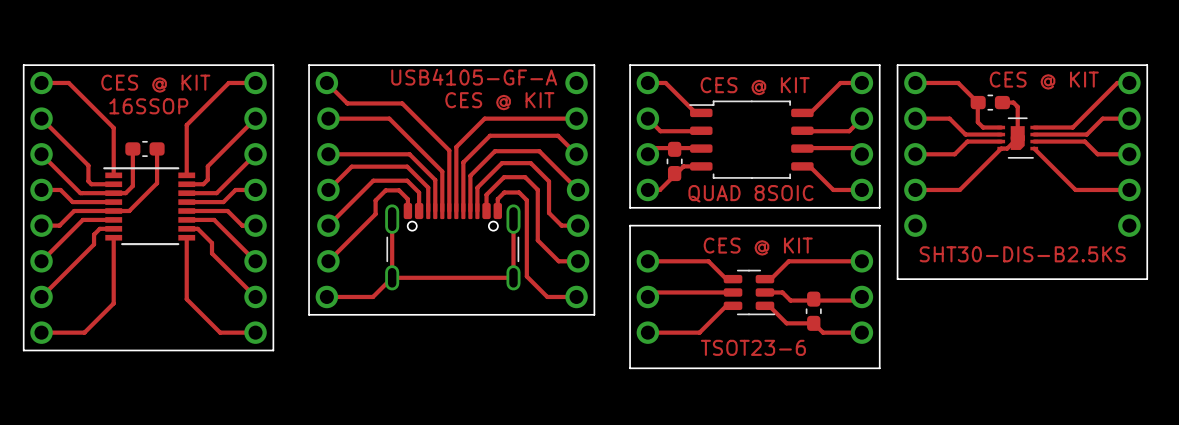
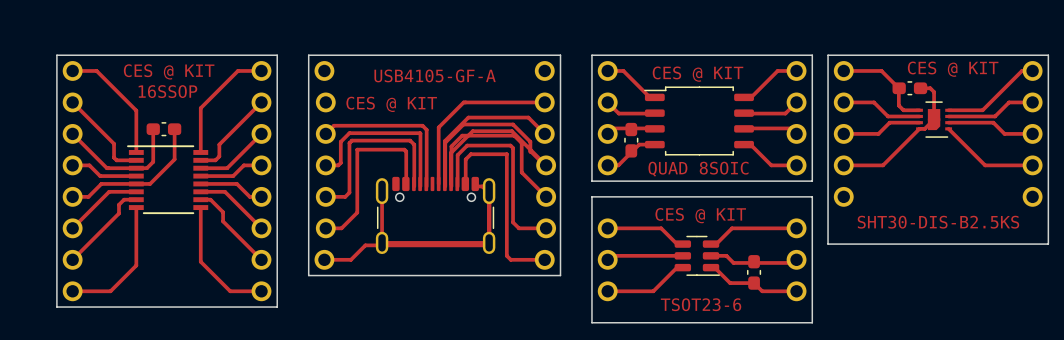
USB4105-GF-A name position: USB4105-GF-A (474, 77) -> USB4105-GF-A (435, 75)
track: (326, 82) (347, 103) (402, 103) (449, 150) (449, 211) -> none
text position: CES @ KIT (499, 101) -> CES @ KIT (391, 104)
track: (328, 118) (389, 118) (442, 171) (442, 211) -> none
track: (328, 154) (409, 154) (435, 180) (435, 211) -> (325, 133) (333, 125) (422, 125) (426, 129) (426, 186)
track: (328, 189) (351, 166) (407, 166) (428, 187) (428, 211) -> (325, 165) (338, 165) (340, 162) (340, 141) (349, 133) (420, 133) (420, 186)
track: none -> (544, 165) (530, 151) (530, 141) (513, 124) (463, 124) (445, 142) (445, 186)
track: (407, 211) (407, 199) (399, 190) (385, 190) (375, 200) (375, 214) (328, 261) -> (406, 186) (406, 151) (404, 149) (357, 149) (357, 212) (341, 228) (325, 228)
track: (419, 211) (419, 192) (407, 180) (373, 180) (328, 225) -> (414, 186) (414, 144) (410, 140) (351, 140) (349, 143) (349, 192) (345, 196) (325, 196)
track: (477, 211) (477, 187) (501, 163) (530, 163) (549, 181) (549, 213) (561, 225) (578, 225) -> (451, 186) (451, 146) (462, 135) (514, 135) (521, 143) (521, 172) (546, 196)
track: (486, 211) (486, 194) (504, 177) (525, 177) (537, 189) (537, 240) (558, 261) -> (457, 186) (457, 155) (467, 145) (510, 145) (513, 148) (513, 222) (518, 228) (529, 228)
track: (497, 211) (497, 199) (504, 192) (519, 192) (526, 200) (526, 276) (547, 296) -> (465, 186) (465, 159) (470, 154) (506, 154) (506, 255) (510, 259) (518, 259)
track: (392, 277) (373, 296) (356, 296) -> (475, 186) (482, 186) (489, 193) (489, 245) (365, 245) (350, 259)

